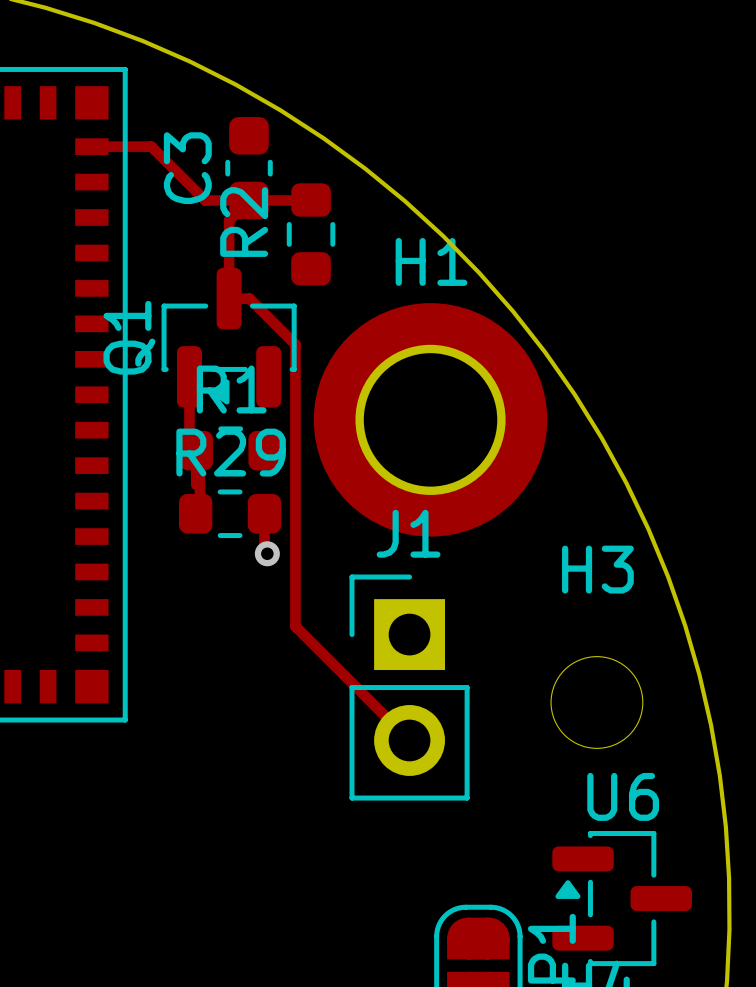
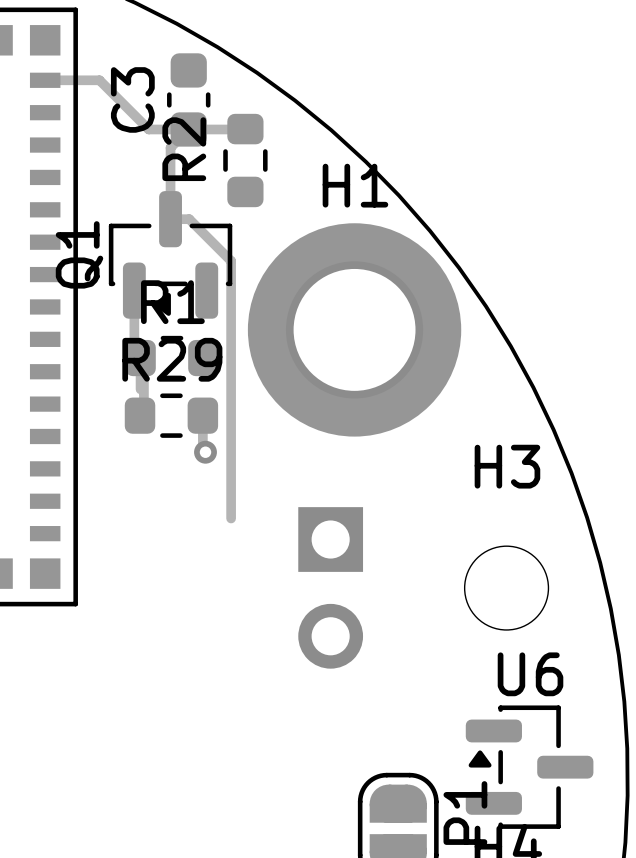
track: (295, 626) (409, 740) -> none
J1 side: top (409, 687) -> bottom (330, 587)

